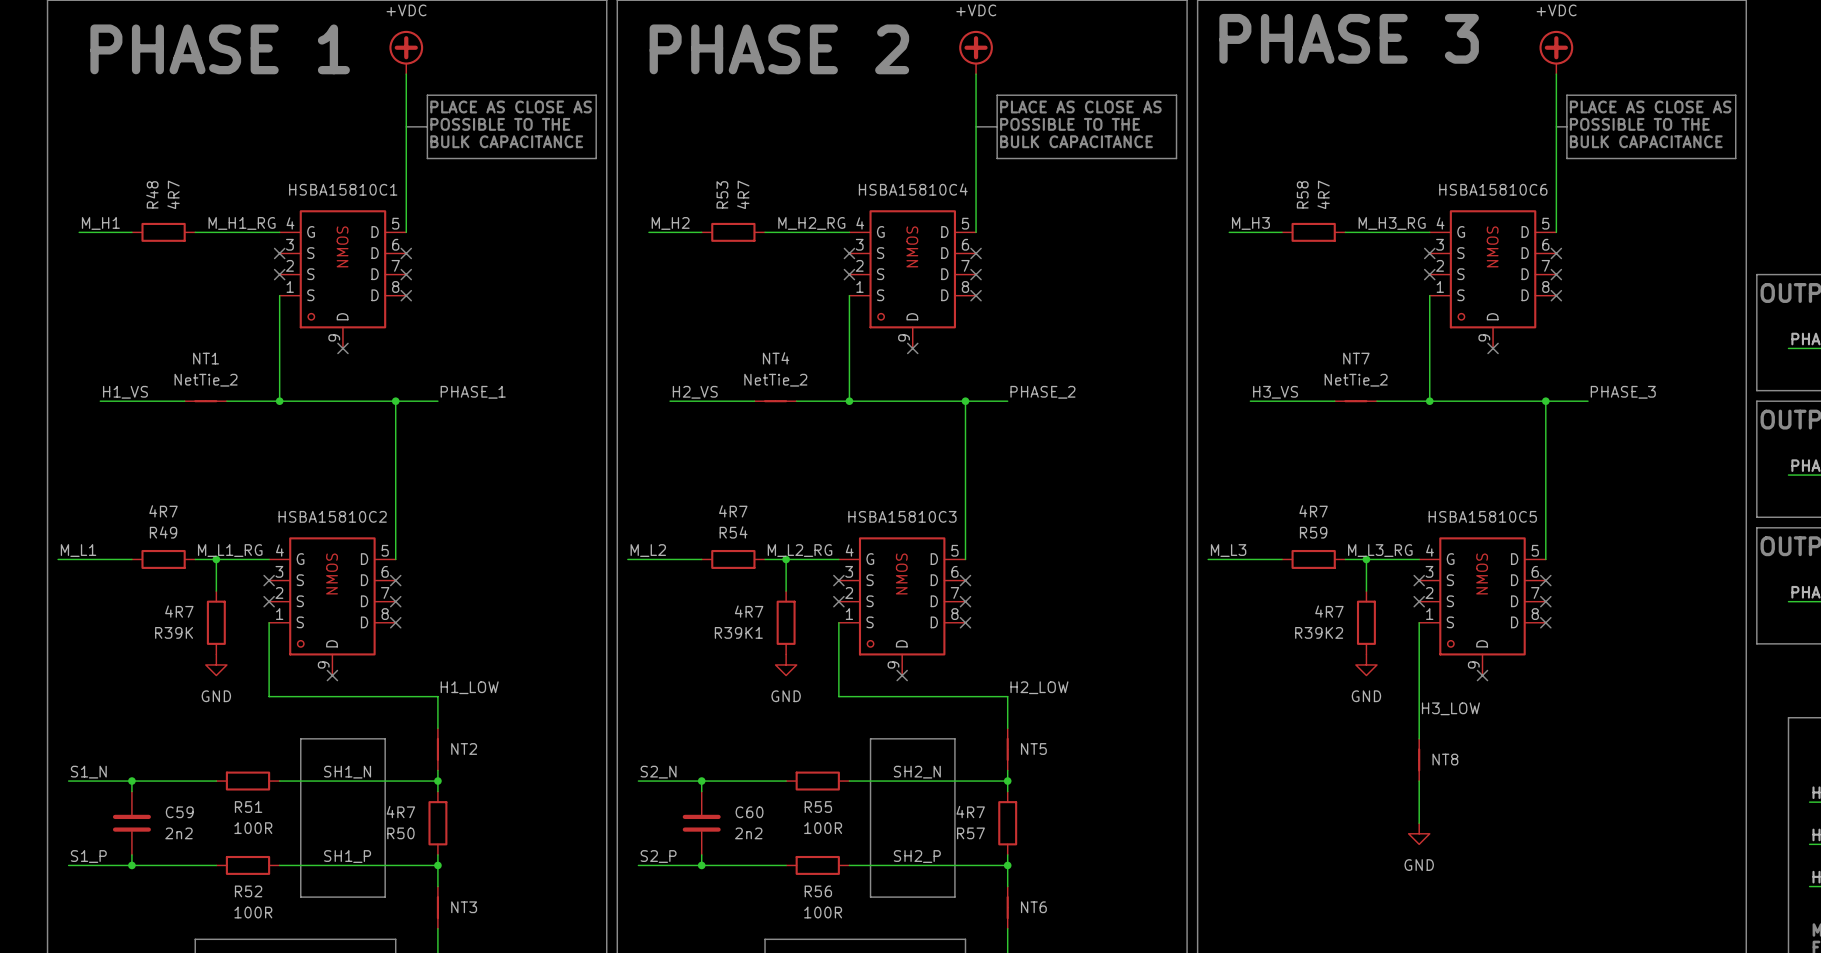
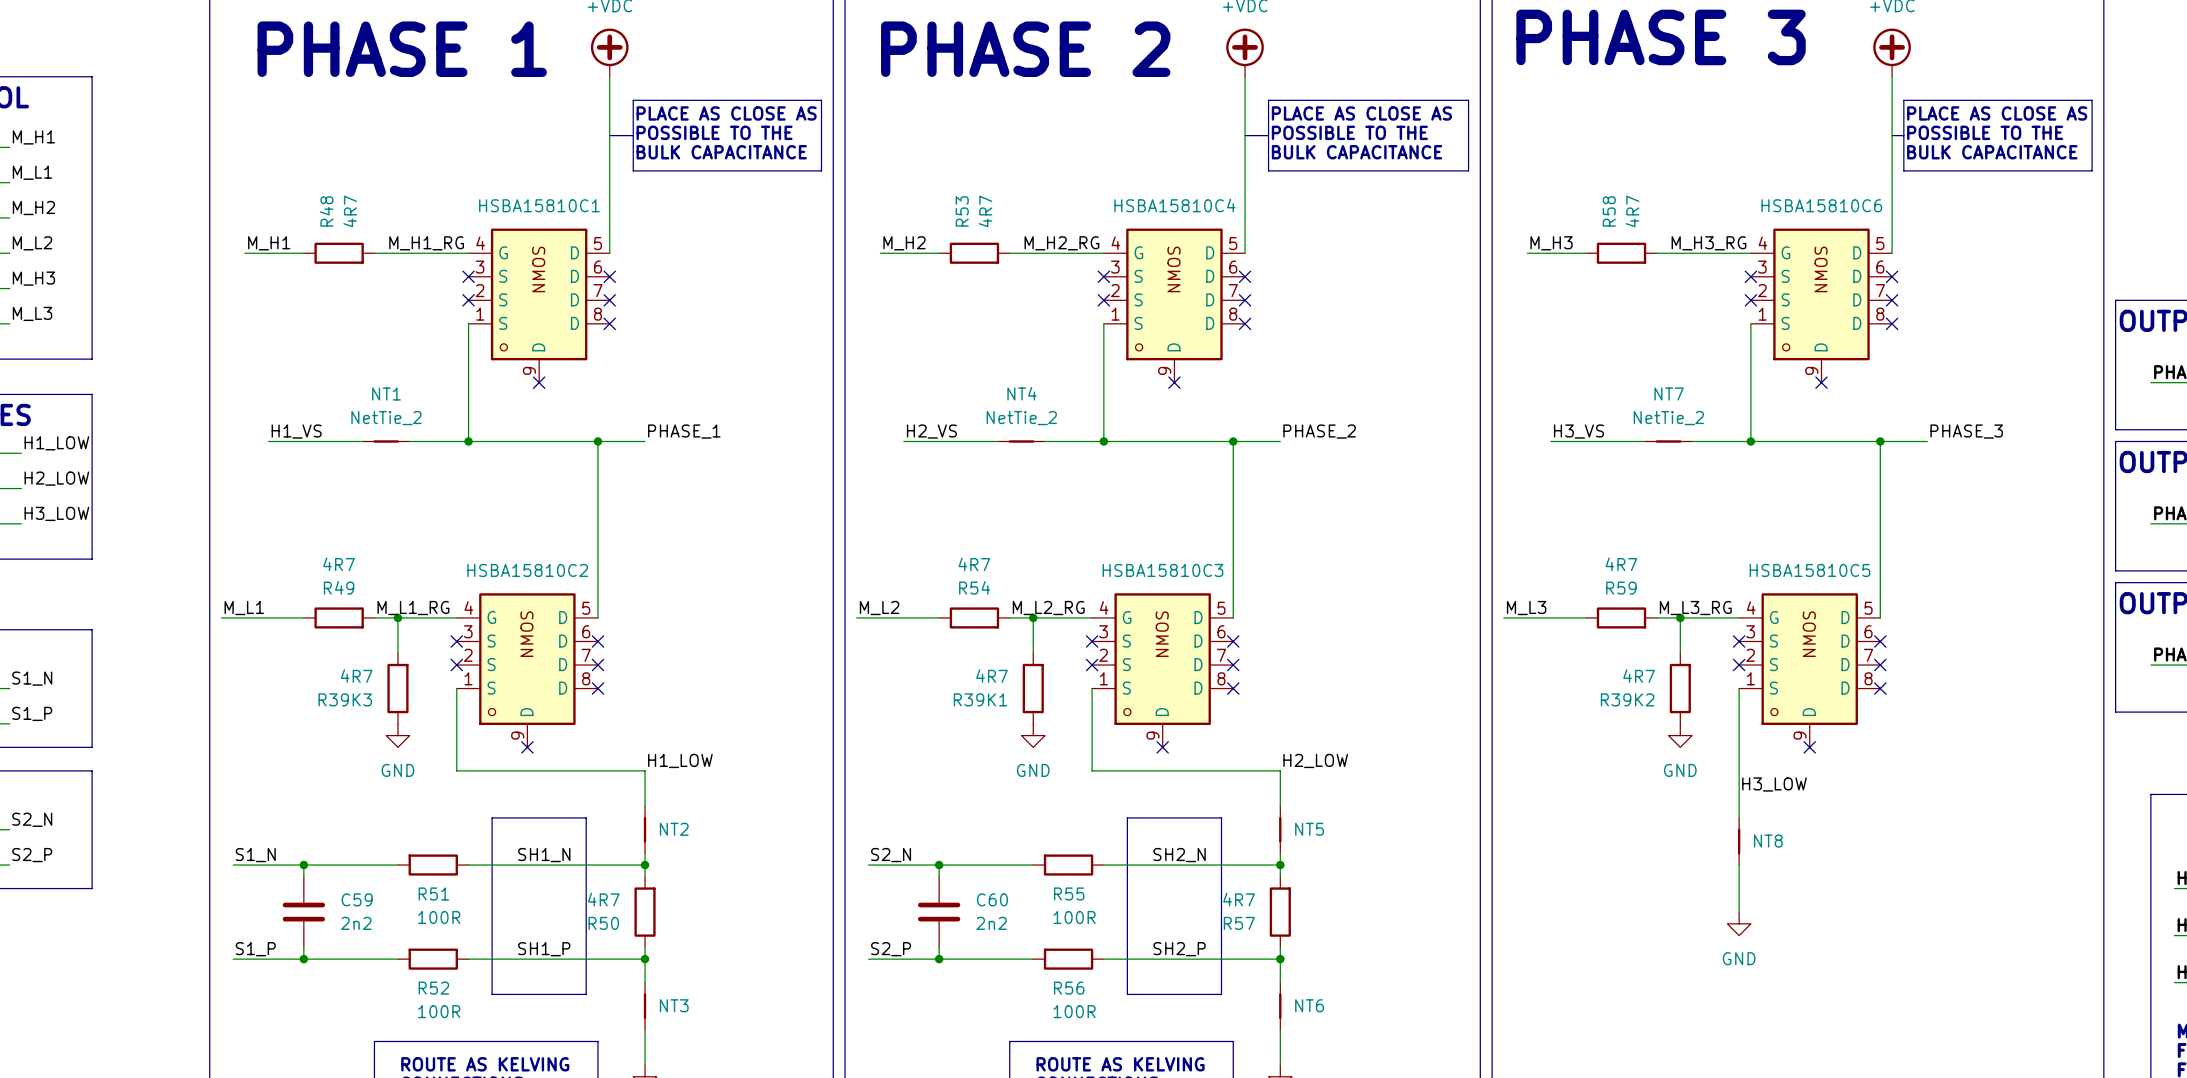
R39K name: R39K (174, 632) -> R39K3 (345, 699)

